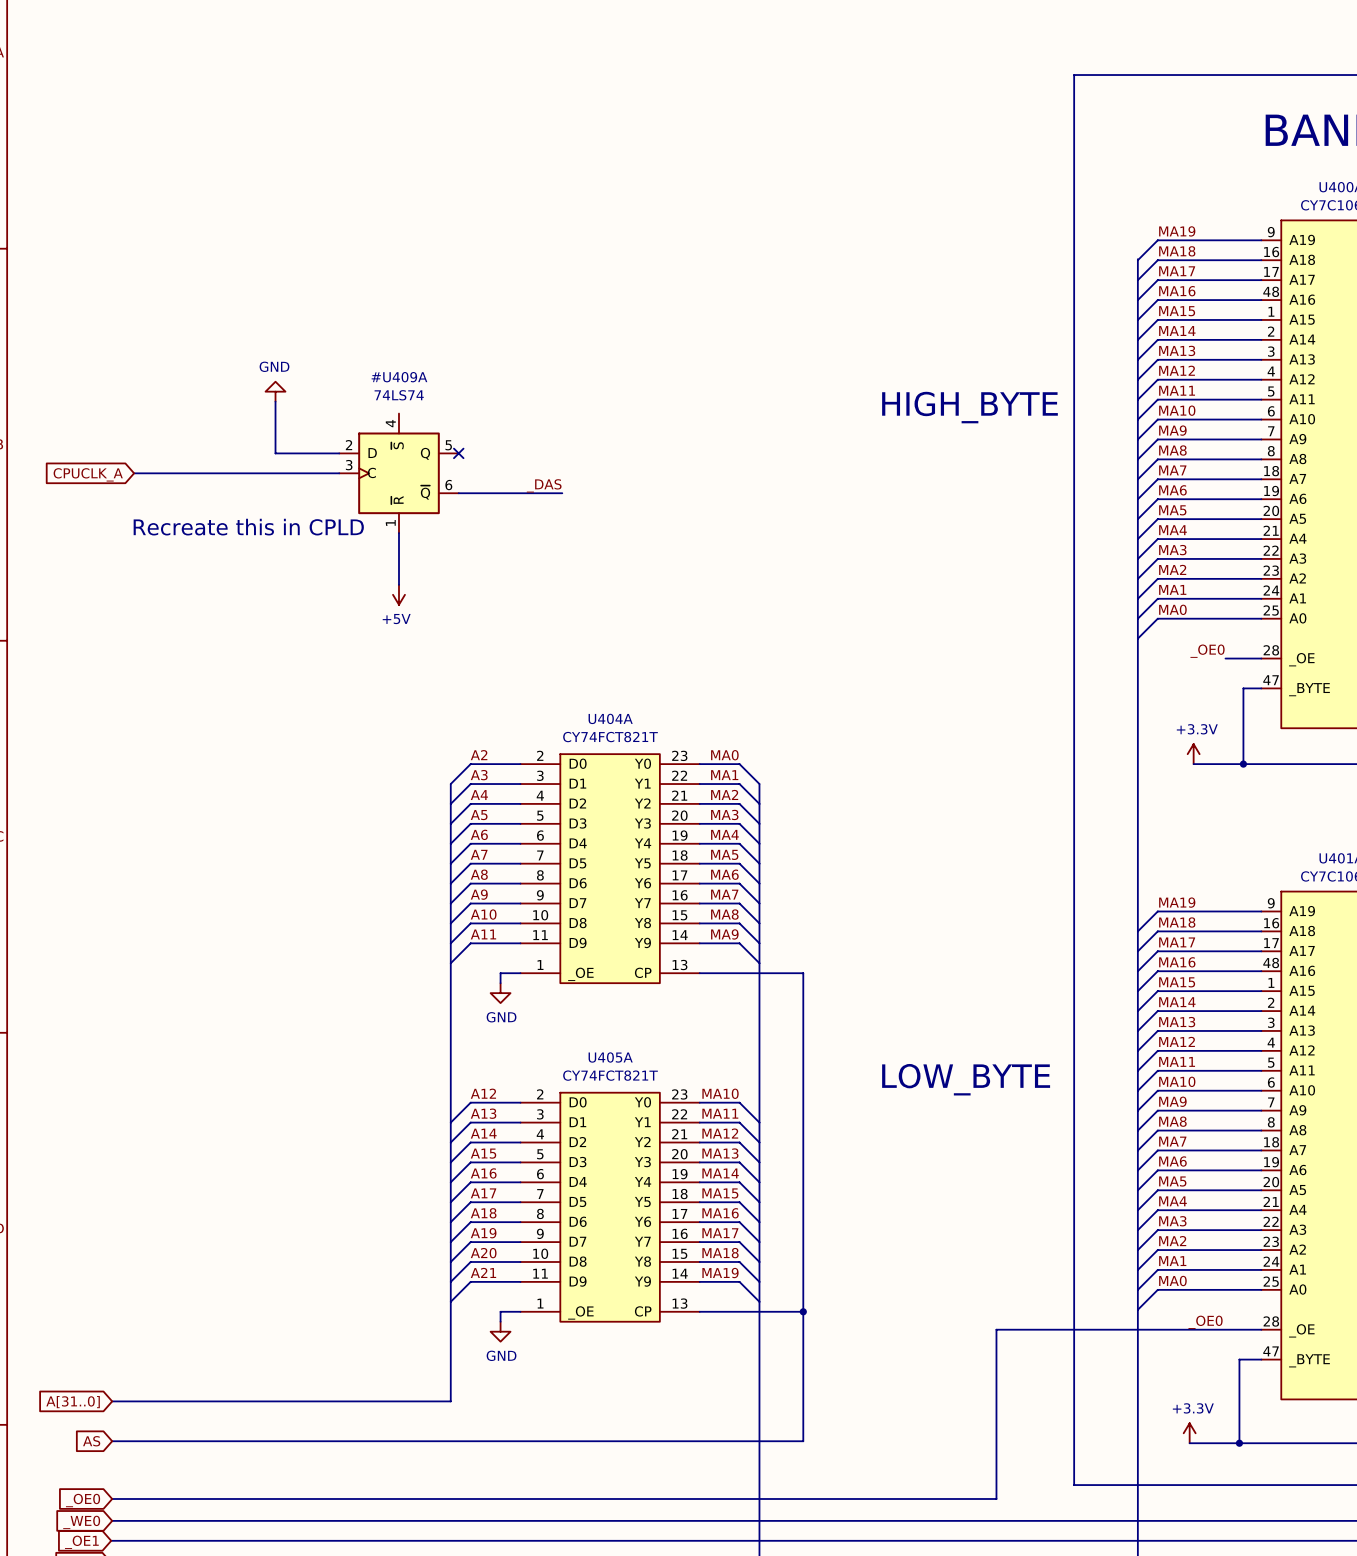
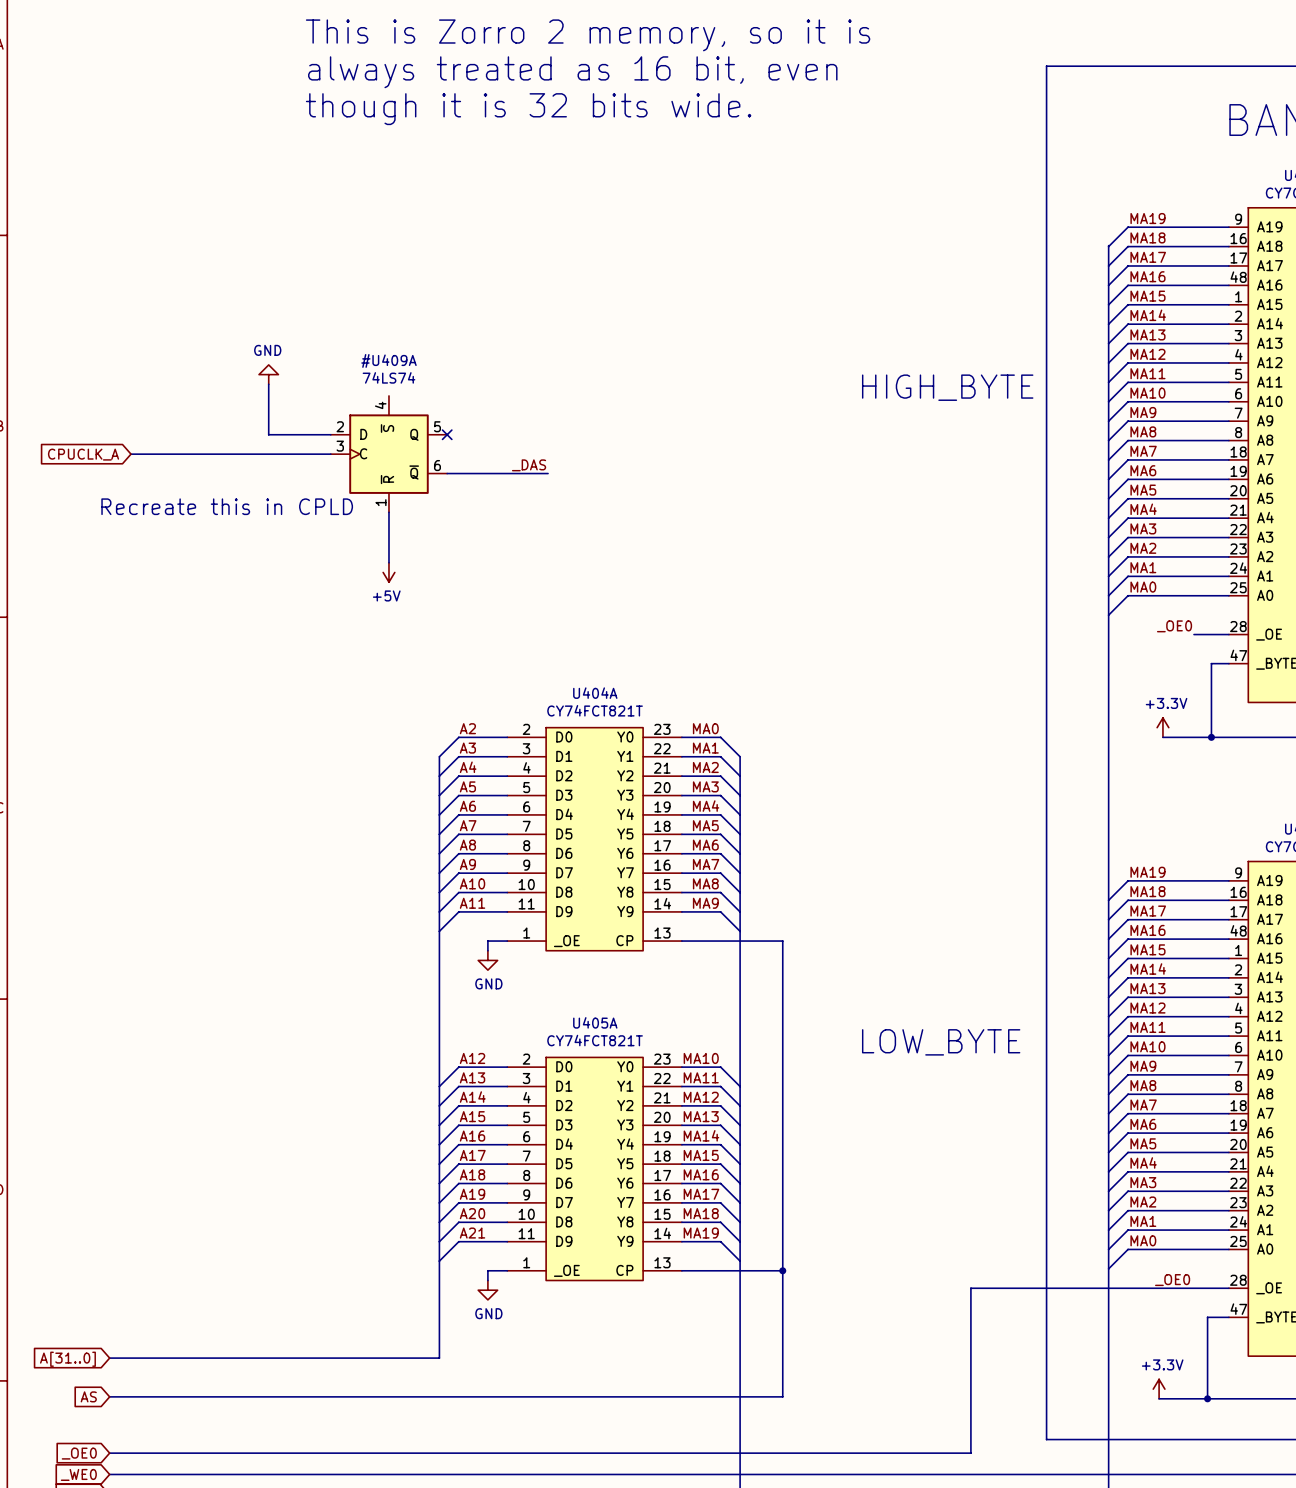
text: none -> This is Zorro 2 memory, so it is (588, 35)
text: none -> always treated as 16 bit, even (572, 72)
text: none -> though it is 32 bits wide. (528, 109)

